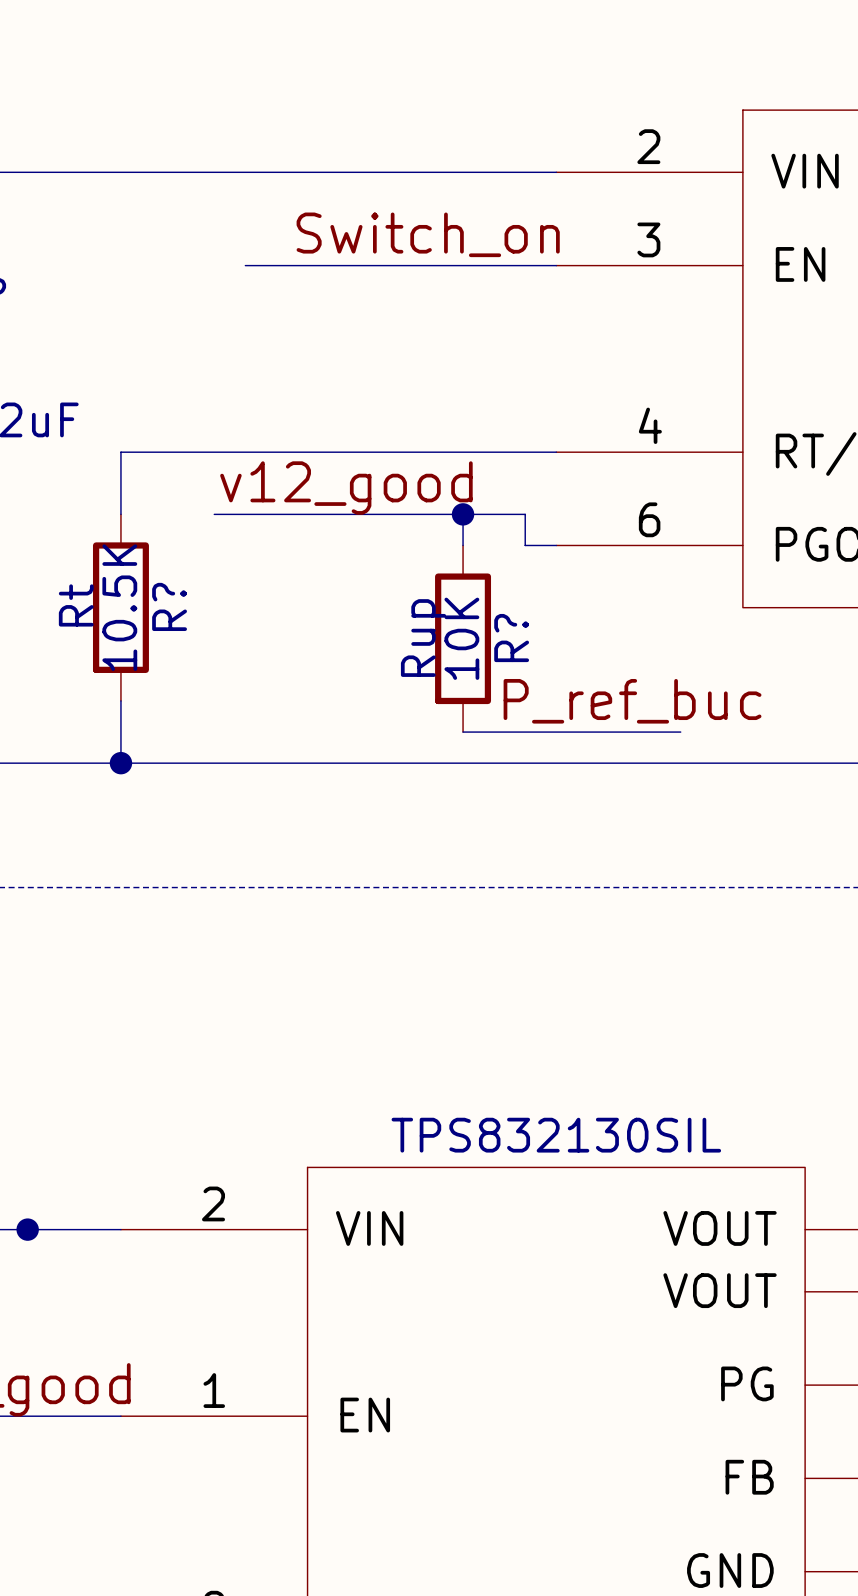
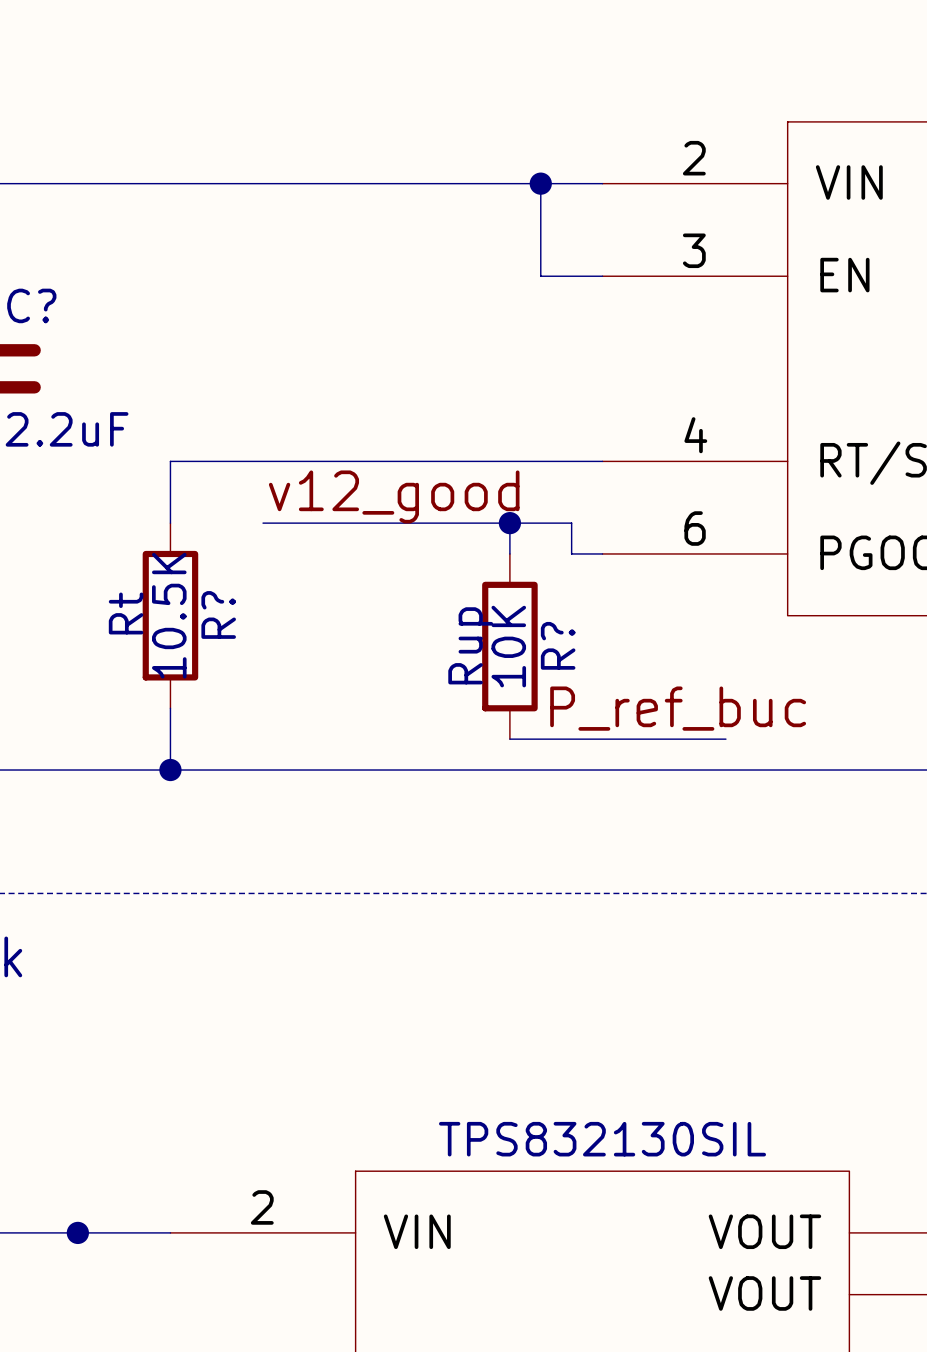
junction: none -> (540, 183)
label: Switch_on (428, 234) -> none
wire: (245, 265) (494, 265) -> (540, 183) (540, 276)

